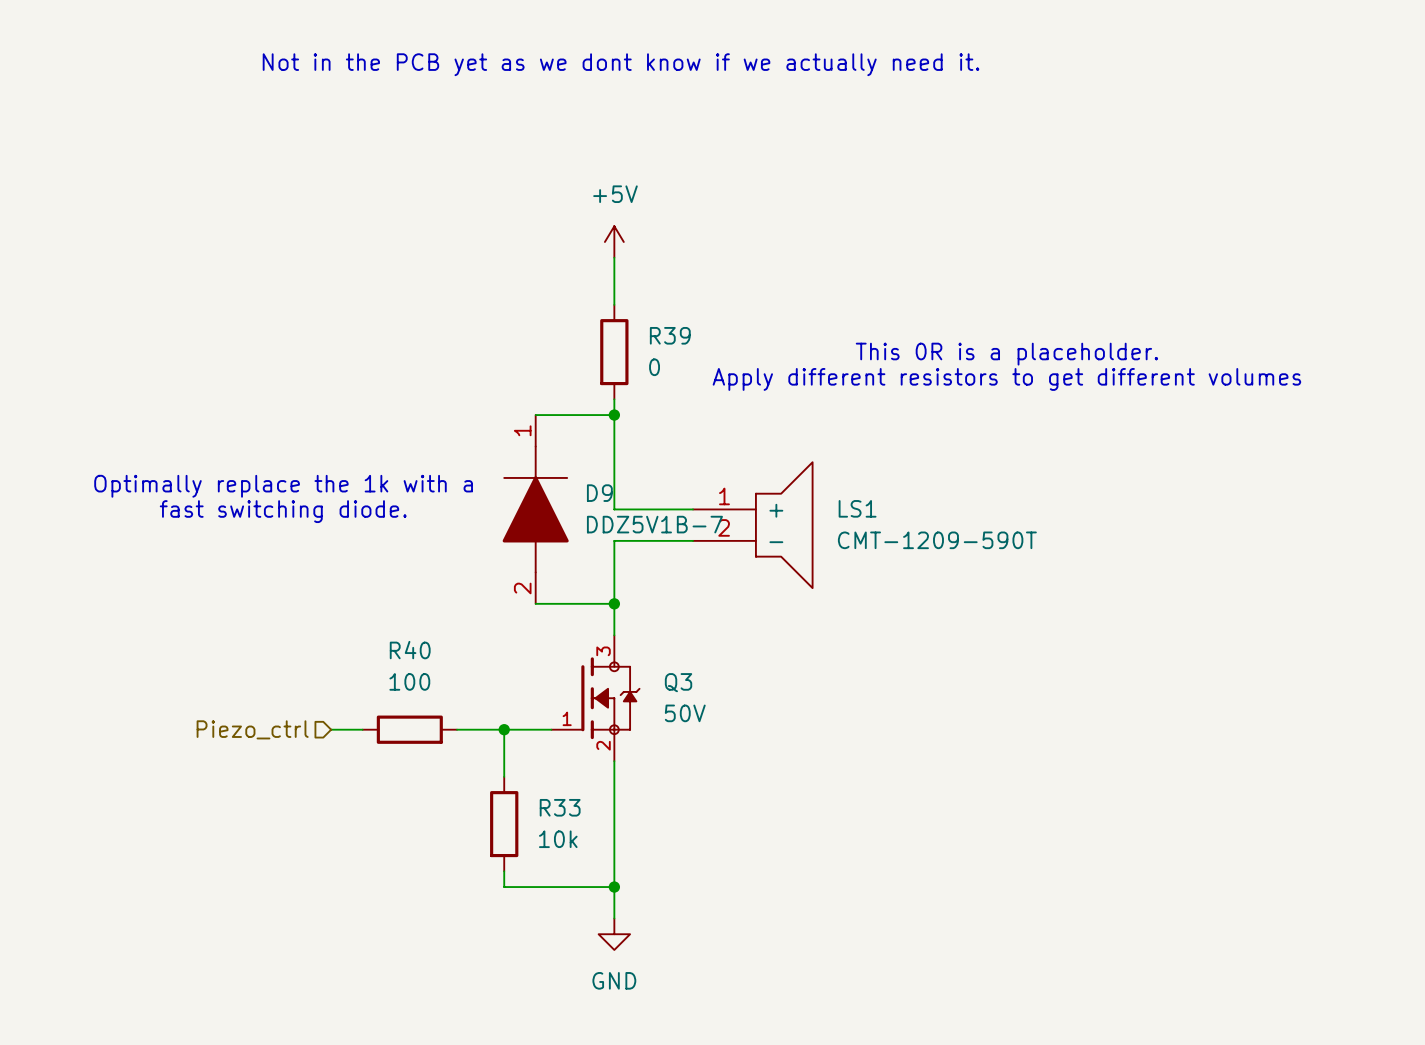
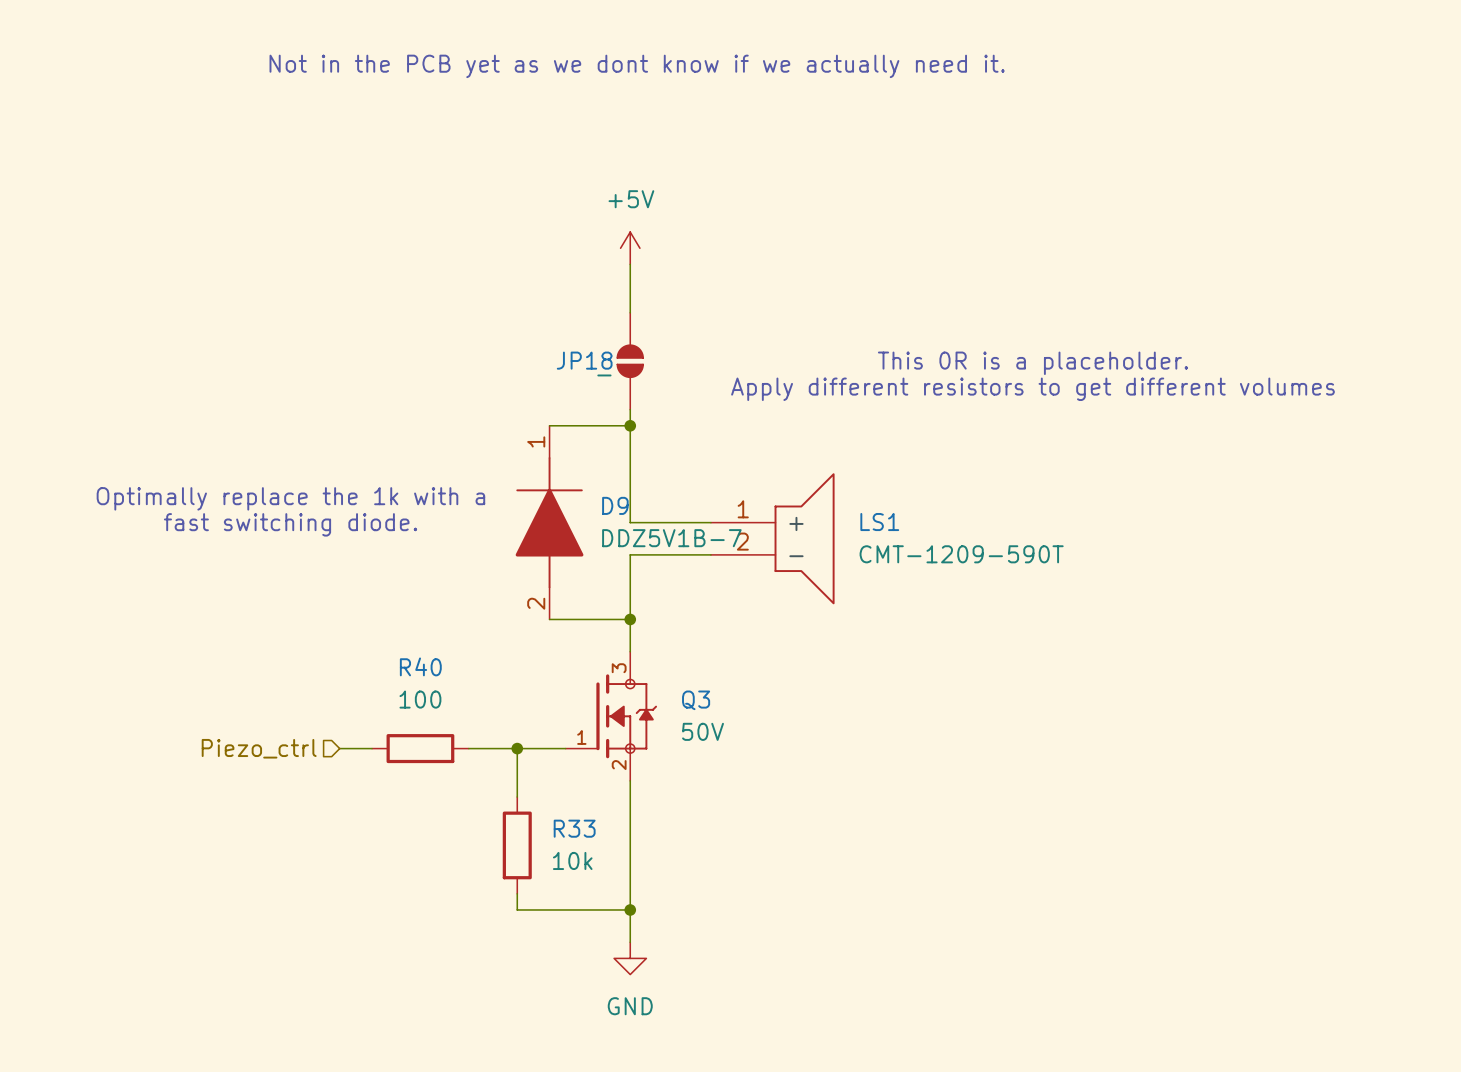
R39: 0 (614, 352) -> none
JP18: none -> - (630, 361)

